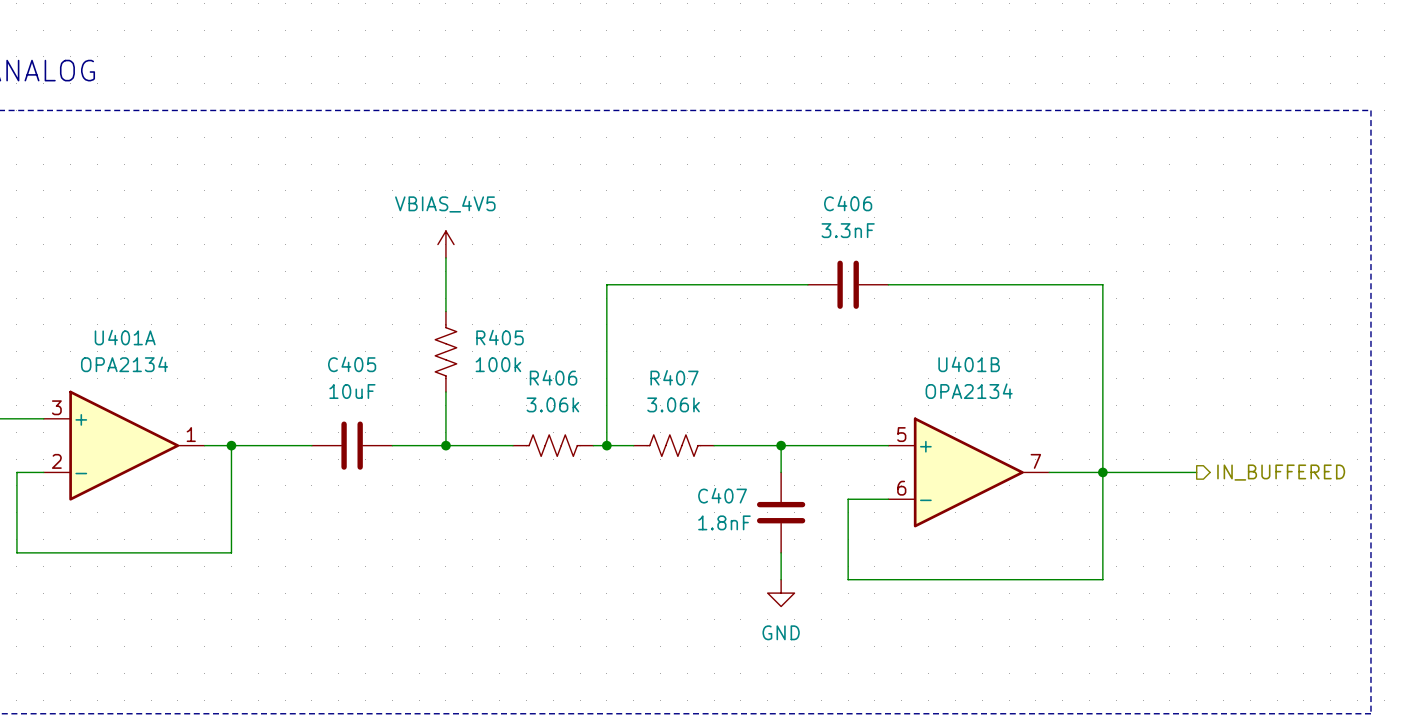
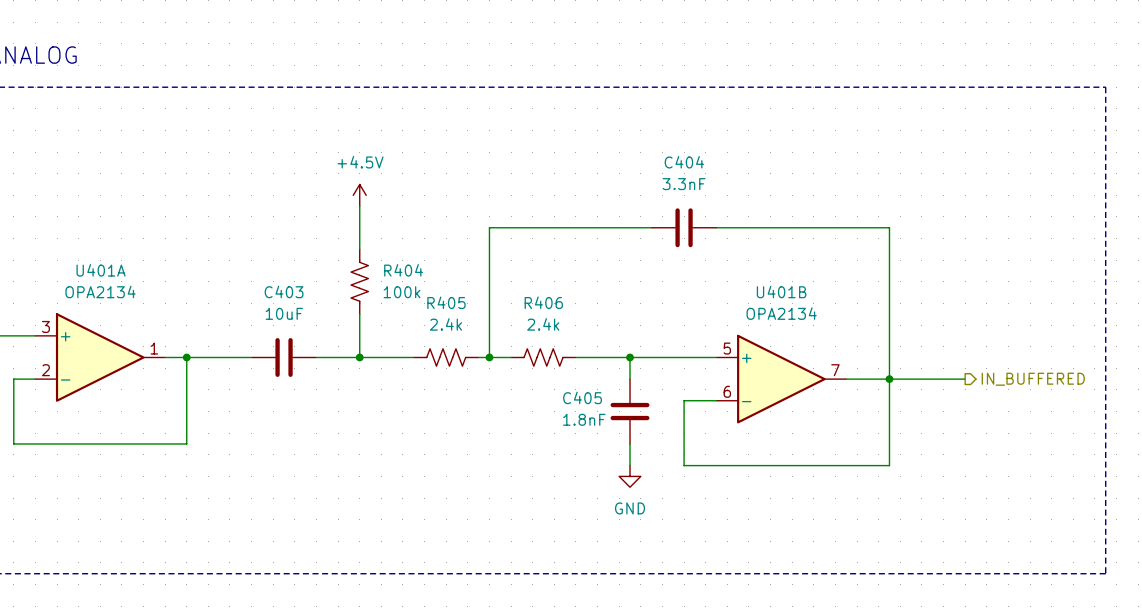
C406 name: C406 (848, 203) -> C404 (684, 162)
power symbol: VBIAS_4V5 (445, 244) -> +4.5V (359, 195)
R405 name: R405 (500, 337) -> R404 (403, 270)
C405 name: C405 (352, 364) -> C403 (284, 291)
R406 name: R406 (553, 377) -> R405 (446, 302)
R407 name: R407 (674, 377) -> R406 (543, 302)
R406 value: 3.06k (552, 404) -> 2.4k (445, 324)
R407 value: 3.06k (673, 404) -> 2.4k (543, 324)
C407 name: C407 (722, 495) -> C405 (582, 397)

